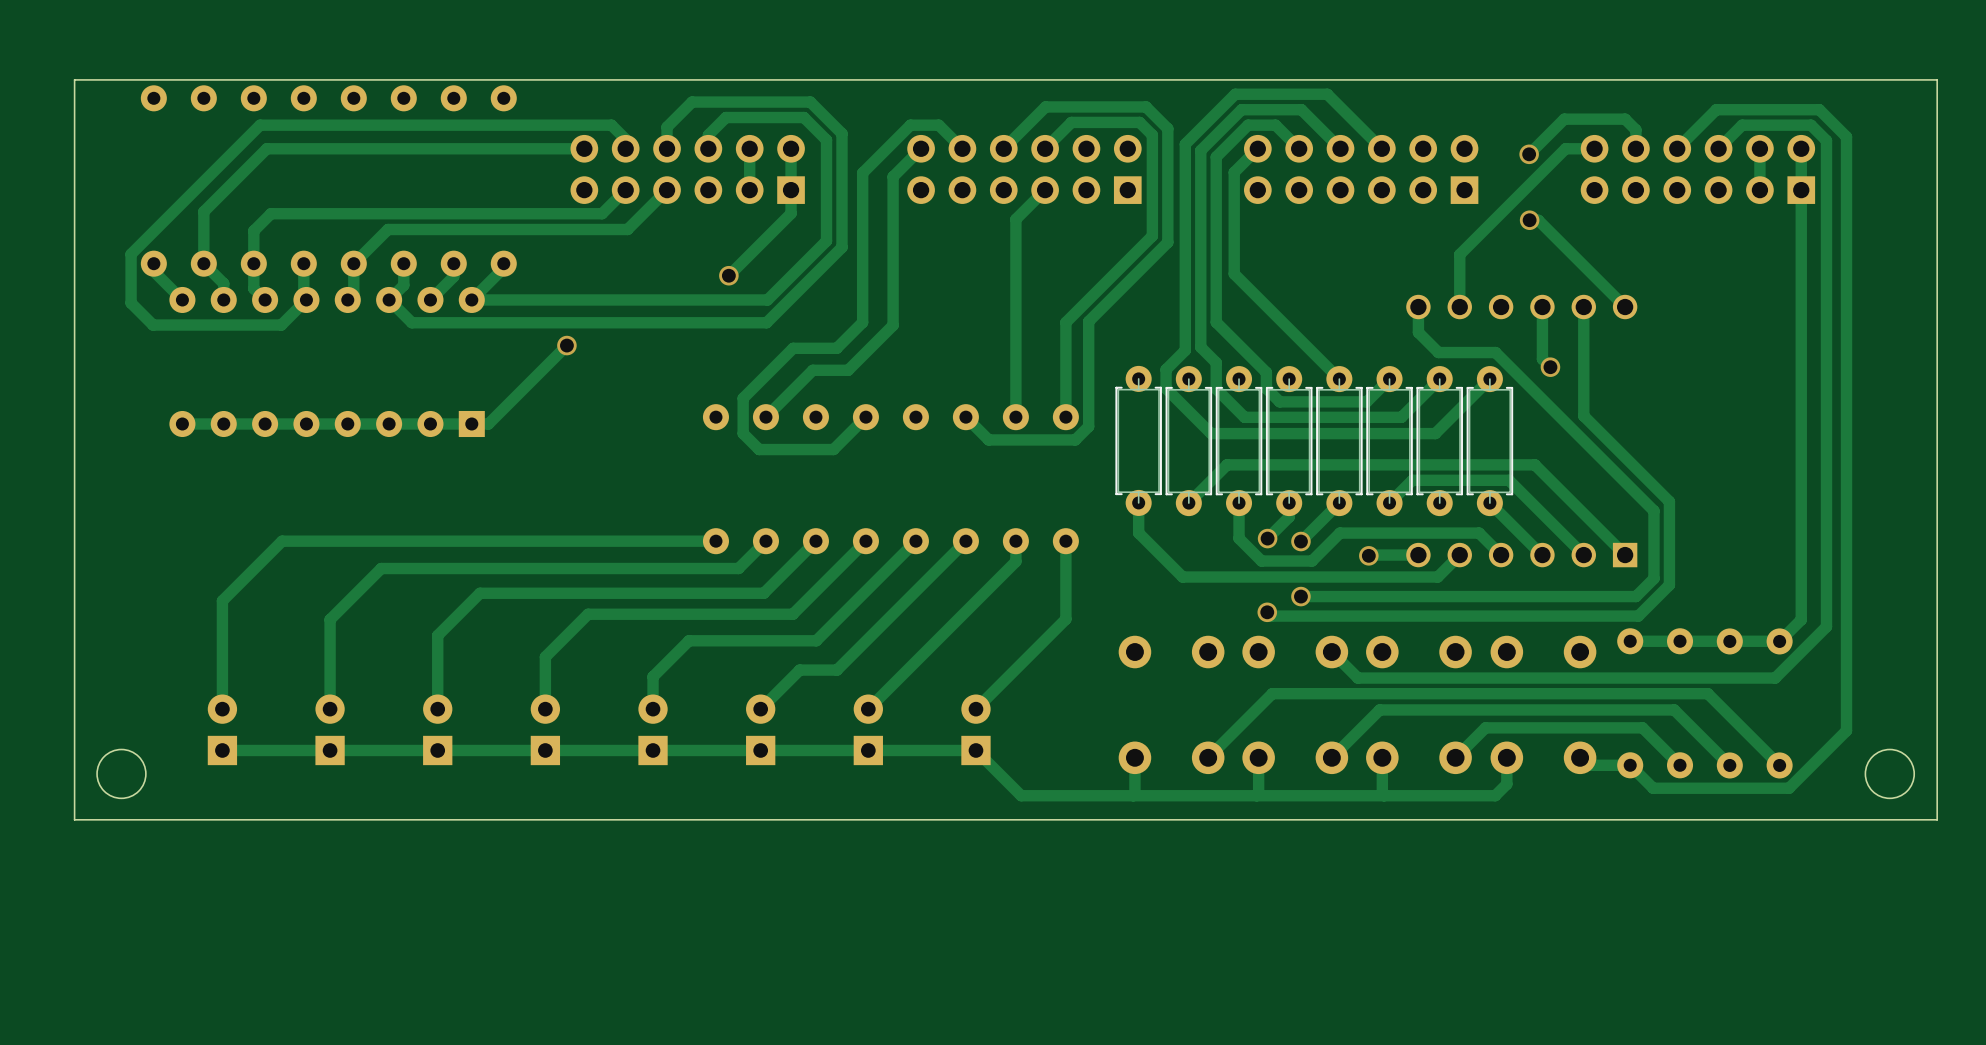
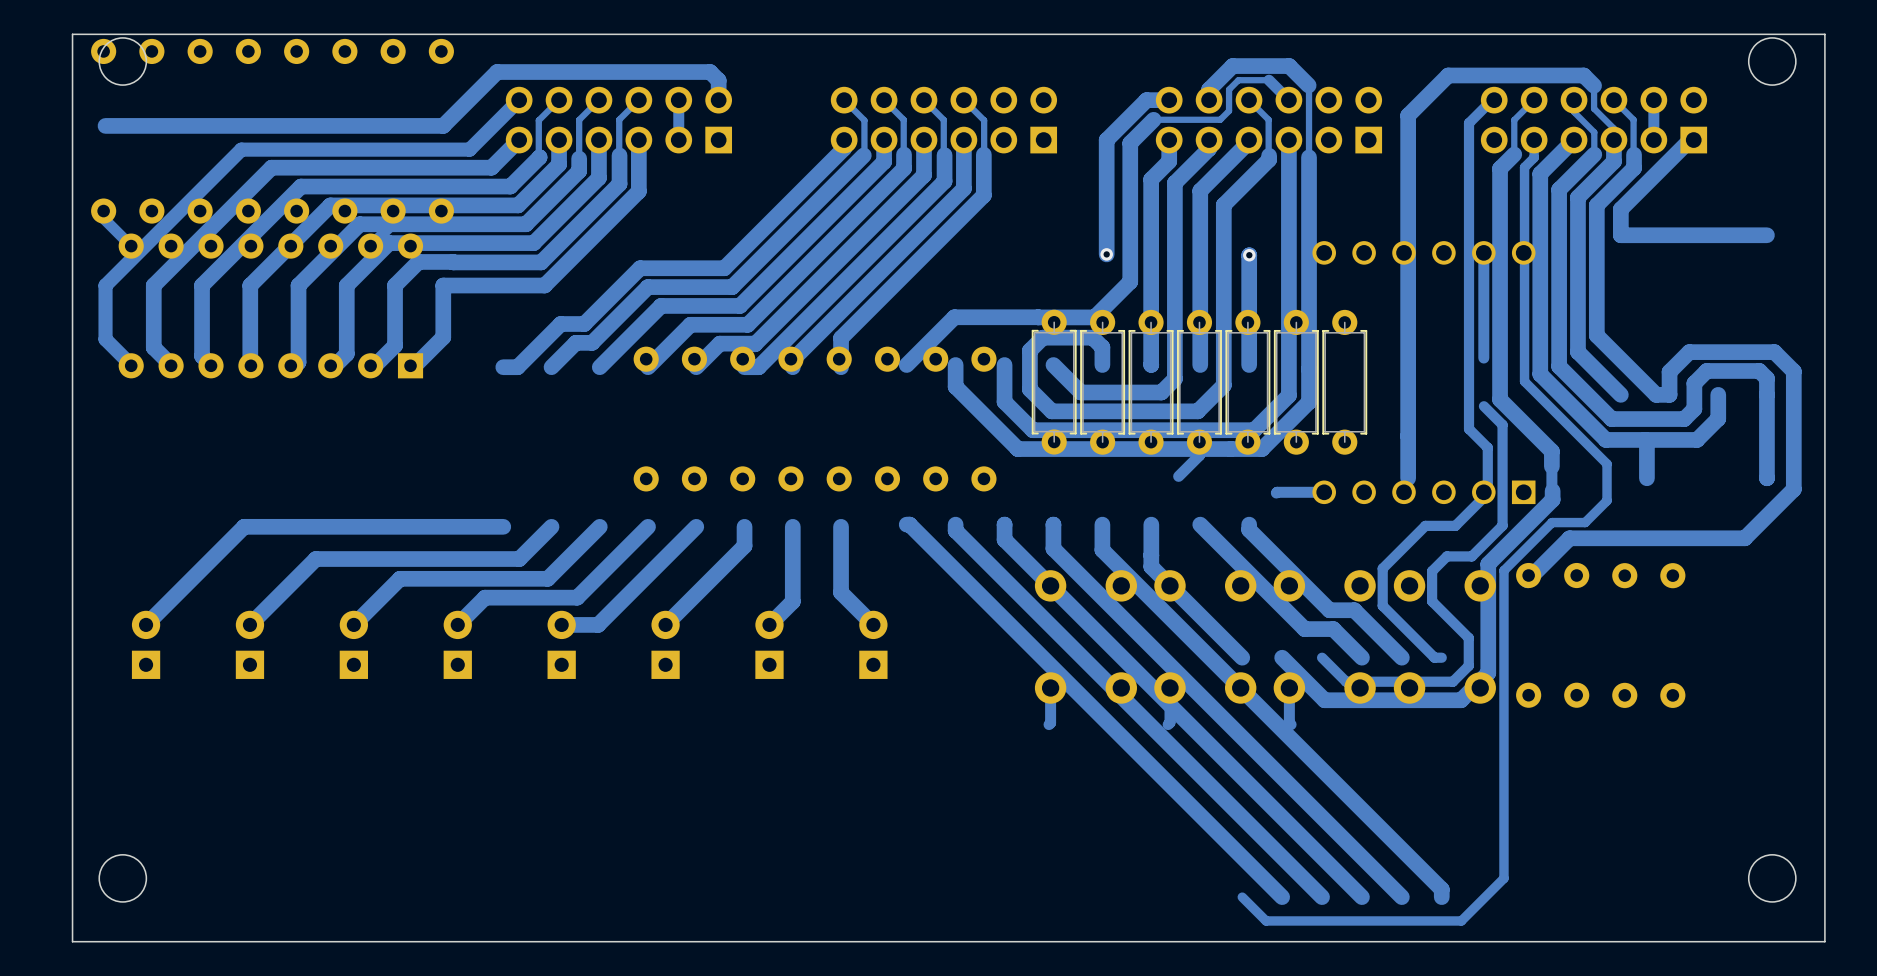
board edge: (1937, 80) (74, 79) (74, 819) (1937, 819) -> (1824, 34) (72, 34) (72, 941) (1824, 941) (1824, 747)
round board edge: none -> [98, 37, 148, 86]
round board edge: none -> [1747, 37, 1797, 86]
track: (1361, 128) (1327, 94) (1235, 94) (1185, 144) (1185, 350) (1166, 369) (1166, 388) (1211, 433) (1435, 433) (1489, 379) -> (1268, 80) (1238, 80) (1229, 89) (1229, 110) (1220, 119) (1153, 119) (1130, 143) (1130, 281) (1094, 317) (1038, 317)
track: (584, 148) (266, 148) (203, 211) (203, 263) (223, 283) (223, 299) -> (519, 100) (469, 149) (241, 149) (105, 285) (105, 339) (133, 367)
track: (625, 148) (625, 139) (611, 125) (260, 125) (131, 254) (131, 303) (153, 325) (281, 325) (306, 299) (303, 297) (303, 263) -> (559, 100) (538, 120) (539, 157)
track: (667, 148) (667, 127) (692, 102) (810, 102) (841, 133) (841, 247) (766, 322) (411, 322) (389, 299) (403, 285) (403, 263) -> (598, 100) (579, 119) (579, 171) (525, 224) (359, 224) (298, 285) (298, 362) (293, 367)
track: (708, 148) (708, 135) (725, 117) (804, 117) (826, 140) (826, 241) (767, 299) (471, 299) (503, 267) (503, 263) -> (638, 100) (619, 119) (619, 184) (541, 262) (418, 261) (395, 285) (395, 345) (373, 367)
track: (791, 148) (791, 213) (728, 275) -> (718, 100) (718, 80) (710, 72) (497, 72) (443, 125) (105, 125)
track: (921, 148) (893, 176) (893, 325) (848, 370) (812, 370) (765, 417) -> (844, 100) (864, 120) (864, 154) (732, 287) (647, 287) (592, 342) (575, 342) (551, 367)
track: (962, 148) (938, 125) (910, 125) (862, 173) (862, 322) (836, 348) (793, 348) (743, 398) (743, 433) (759, 449) (833, 449) (865, 417) -> (884, 100) (903, 119) (904, 168) (747, 324) (690, 324) (648, 367)
track: (1003, 148) (1045, 106) (1146, 106) (1167, 128) (1167, 242) (1088, 321) (1088, 426) (1075, 439) (988, 439) (965, 417) -> (923, 100) (943, 119) (944, 181) (758, 367) (744, 367)
track: (1045, 148) (1071, 122) (1139, 122) (1152, 135) (1152, 236) (1065, 322) (1065, 417) -> (963, 100) (984, 120) (983, 195) (841, 338) (841, 367)
track: (1257, 148) (1234, 172) (1234, 273) (1339, 379) -> (1169, 100) (1146, 100) (1106, 140) (1106, 254)
track: (1299, 148) (1275, 125) (1248, 125) (1216, 157) (1216, 322) (1266, 372) (1266, 388) (1279, 401) (1366, 401) (1389, 379) -> (1209, 100) (1209, 89) (1232, 66) (1289, 66) (1309, 85) (1309, 402) (1262, 449) (1017, 449) (955, 386) (955, 365)
track: (1340, 148) (1301, 109) (1241, 109) (1200, 150) (1200, 347) (1216, 362) (1216, 388) (1244, 417) (1401, 417) (1439, 379) -> (1249, 100) (1268, 119) (1269, 159) (1223, 205) (1223, 385) (1197, 411) (1051, 411) (1029, 389) (1029, 350) (1042, 337) (1092, 337) (1102, 347) (1102, 365)
track: (1592, 148) (1565, 148) (1459, 254) (1459, 307) -> (1492, 100) (1469, 123) (1469, 429) (1487, 447) (1487, 493) (1455, 525) (1425, 525) (1382, 568) (1382, 605) (1434, 657) (1441, 657)
track: (1635, 148) (1635, 129) (1625, 119) (1564, 119) (1529, 154) -> (1534, 100) (1514, 120) (1514, 154) (1500, 168) (1500, 399) (1551, 451) (1552, 499) (1488, 564) (1488, 673) (1461, 700) (1324, 700) (1282, 657)
track: (1677, 148) (1716, 109) (1819, 109) (1846, 136) (1846, 730) (1789, 788) (1653, 788) (1630, 765) (1587, 765) (1580, 757) -> (1574, 100) (1574, 112) (1594, 132) (1594, 154) (1559, 189) (1559, 366) (1611, 419) (1684, 419) (1694, 408) (1694, 383) (1706, 370) (1759, 370) (1766, 378) (1766, 478)
track: (1718, 148) (1742, 125) (1811, 125) (1826, 140) (1826, 626) (1775, 678) (1357, 678) (1331, 652) -> (1613, 100) (1633, 119) (1634, 168) (1596, 205) (1596, 335) (1656, 394) (1669, 394) (1669, 371) (1689, 352) (1774, 352) (1793, 371) (1793, 489) (1744, 538) (1569, 538) (1527, 580)
track: (1801, 148) (1801, 619) (1779, 641) -> none
via: (1529, 154) -> none
track: none -> (519, 140) (491, 167) (271, 167) (153, 285) (153, 347) (173, 367)
track: (625, 190) (602, 213) (271, 213) (253, 230) (253, 288) (265, 299) -> (559, 140) (559, 164) (518, 205) (330, 205) (250, 285) (250, 364) (253, 367)
track: (667, 190) (627, 229) (387, 229) (353, 263) (353, 293) (347, 299) -> (598, 140) (598, 177) (533, 243) (389, 243) (346, 285) (346, 353) (333, 367)
track: none -> (638, 140) (638, 191) (544, 285) (443, 285) (443, 337) (413, 367)
track: none -> (844, 140) (844, 148) (724, 268) (640, 268) (584, 324) (560, 324) (517, 367) (503, 367)
track: none -> (884, 140) (884, 161) (739, 305) (661, 305) (599, 367)
track: none -> (923, 140) (923, 175) (754, 344) (719, 343) (696, 367)
track: (1045, 190) (1015, 219) (1015, 417) -> (963, 140) (963, 188) (792, 359) (792, 367)
track: none -> (1169, 140) (1169, 161) (1151, 179) (1151, 364)
track: none -> (1209, 140) (1209, 148) (1174, 183) (1174, 378) (1161, 392) (1080, 392) (1053, 365)
track: none -> (1249, 140) (1200, 190) (1200, 365)
track: none -> (1288, 140) (1288, 395) (1254, 430) (1032, 430) (1004, 401) (1004, 365)
track: none -> (1534, 140) (1534, 157) (1524, 167) (1524, 381) (1607, 463) (1607, 500) (1585, 522) (1552, 522) (1503, 570) (1503, 878) (1461, 920) (1266, 920) (1242, 897)
track: none -> (1574, 140) (1540, 173) (1540, 374) (1605, 439) (1697, 439) (1718, 418) (1718, 394)
track: none -> (1693, 140) (1690, 140) (1620, 209) (1620, 235) (1766, 235)
track: none -> (539, 157) (510, 186) (300, 186) (202, 285) (202, 356) (213, 367)
track: (1529, 220) (1538, 220) (1625, 307) -> none
via: (1529, 220) -> none
via: (728, 275) -> none
track: (1418, 307) (1418, 332) (1438, 352) (1495, 352) (1653, 510) (1653, 578) (1636, 596) (1300, 596) -> none
track: (1542, 307) (1542, 359) (1550, 367) -> none
via: none -> (1106, 254)
track: none -> (1249, 255) (1249, 365)
via: none -> (1249, 255)
track: (566, 345) (488, 424) (182, 424) -> none
via: (566, 345) -> none
via: (1550, 367) -> none
track: none -> (1038, 317) (954, 317) (906, 365)
track: (1583, 415) (1669, 501) (1669, 585) (1638, 616) (1271, 616) (1267, 612) -> none
part: (1489, 441) -> none
track: none -> (1620, 394) (1577, 351) (1577, 197) (1613, 161) (1613, 128) (1594, 108) (1594, 85) (1583, 75) (1448, 75) (1408, 115) (1408, 478)
track: none -> (1483, 406) (1502, 424) (1502, 525) (1471, 556) (1446, 556) (1432, 571) (1432, 601) (1468, 638) (1468, 665) (1452, 681) (1346, 681) (1322, 657)
track: none -> (1645, 439) (1646, 441) (1646, 478)
track: (1138, 502) (1138, 533) (1182, 577) (1437, 577) (1459, 555) -> none
track: (1188, 503) (1227, 464) (1534, 464) (1625, 555) -> none
track: (1239, 503) (1239, 538) (1261, 561) (1312, 561) (1339, 533) (1479, 533) (1501, 555) -> none
track: (1339, 503) (1300, 541) -> none
track: (1389, 503) (1412, 480) (1509, 480) (1583, 555) -> none
track: (1489, 503) (1542, 555) -> none
via: (1267, 538) -> none
track: (715, 541) (282, 541) (222, 600) (222, 709) -> none
track: (765, 541) (738, 568) (381, 568) (330, 619) (330, 709) -> none
track: (815, 541) (763, 593) (480, 593) (437, 635) (437, 709) -> none
track: (865, 541) (792, 614) (588, 614) (545, 656) (545, 709) -> none
track: (915, 541) (816, 640) (689, 640) (653, 676) (653, 709) -> none
track: (965, 541) (837, 670) (799, 670) (760, 709) -> none
track: (1015, 541) (1015, 561) (868, 709) -> none
track: (1065, 541) (1065, 619) (975, 709) -> none
via: (1300, 541) -> none
via: (1368, 555) -> none
track: none -> (906, 524) (909, 524) (1282, 897)
track: none -> (955, 524) (955, 530) (1322, 897)
track: none -> (1004, 524) (1004, 539) (1361, 897)
track: none -> (1053, 524) (1053, 548) (1401, 897)
track: none -> (1102, 524) (1102, 550) (1441, 889) (1441, 897)
track: none -> (1151, 524) (1151, 566) (1242, 657)
track: none -> (1200, 524) (1304, 629) (1333, 629) (1361, 657)
track: none -> (1249, 524) (1249, 529) (1329, 610) (1354, 610) (1401, 657)
track: none -> (503, 526) (244, 526) (146, 624)
track: none -> (551, 526) (519, 559) (315, 559) (249, 624)
track: none -> (599, 526) (547, 578) (399, 578) (353, 624)
track: none -> (648, 526) (577, 597) (485, 597) (457, 624)
track: none -> (696, 526) (598, 624) (561, 624)
track: none -> (744, 526) (744, 545) (665, 624)
track: none -> (792, 526) (792, 601) (769, 624)
track: none -> (841, 526) (841, 592) (873, 624)
via: (1300, 596) -> none
via: (1267, 612) -> none
track: (1779, 641) (1630, 641) -> none
part position: (222, 729) -> (146, 644)
part position: (330, 729) -> (249, 644)
part position: (437, 729) -> (353, 644)
part position: (545, 729) -> (457, 644)
part position: (653, 729) -> (561, 644)
part position: (760, 729) -> (665, 644)
part position: (868, 729) -> (769, 644)
part position: (975, 729) -> (873, 644)
track: (222, 750) (975, 750) (1021, 795) (1495, 795) (1506, 784) (1506, 757) -> none
track: (1208, 757) (1272, 693) (1707, 693) (1779, 765) -> none
track: (1331, 757) (1379, 709) (1674, 709) (1729, 765) -> none
track: (1455, 757) (1485, 727) (1642, 727) (1680, 765) -> none
round board edge position: (121, 773) -> (122, 878)
round board edge position: (1889, 773) -> (1772, 878)

